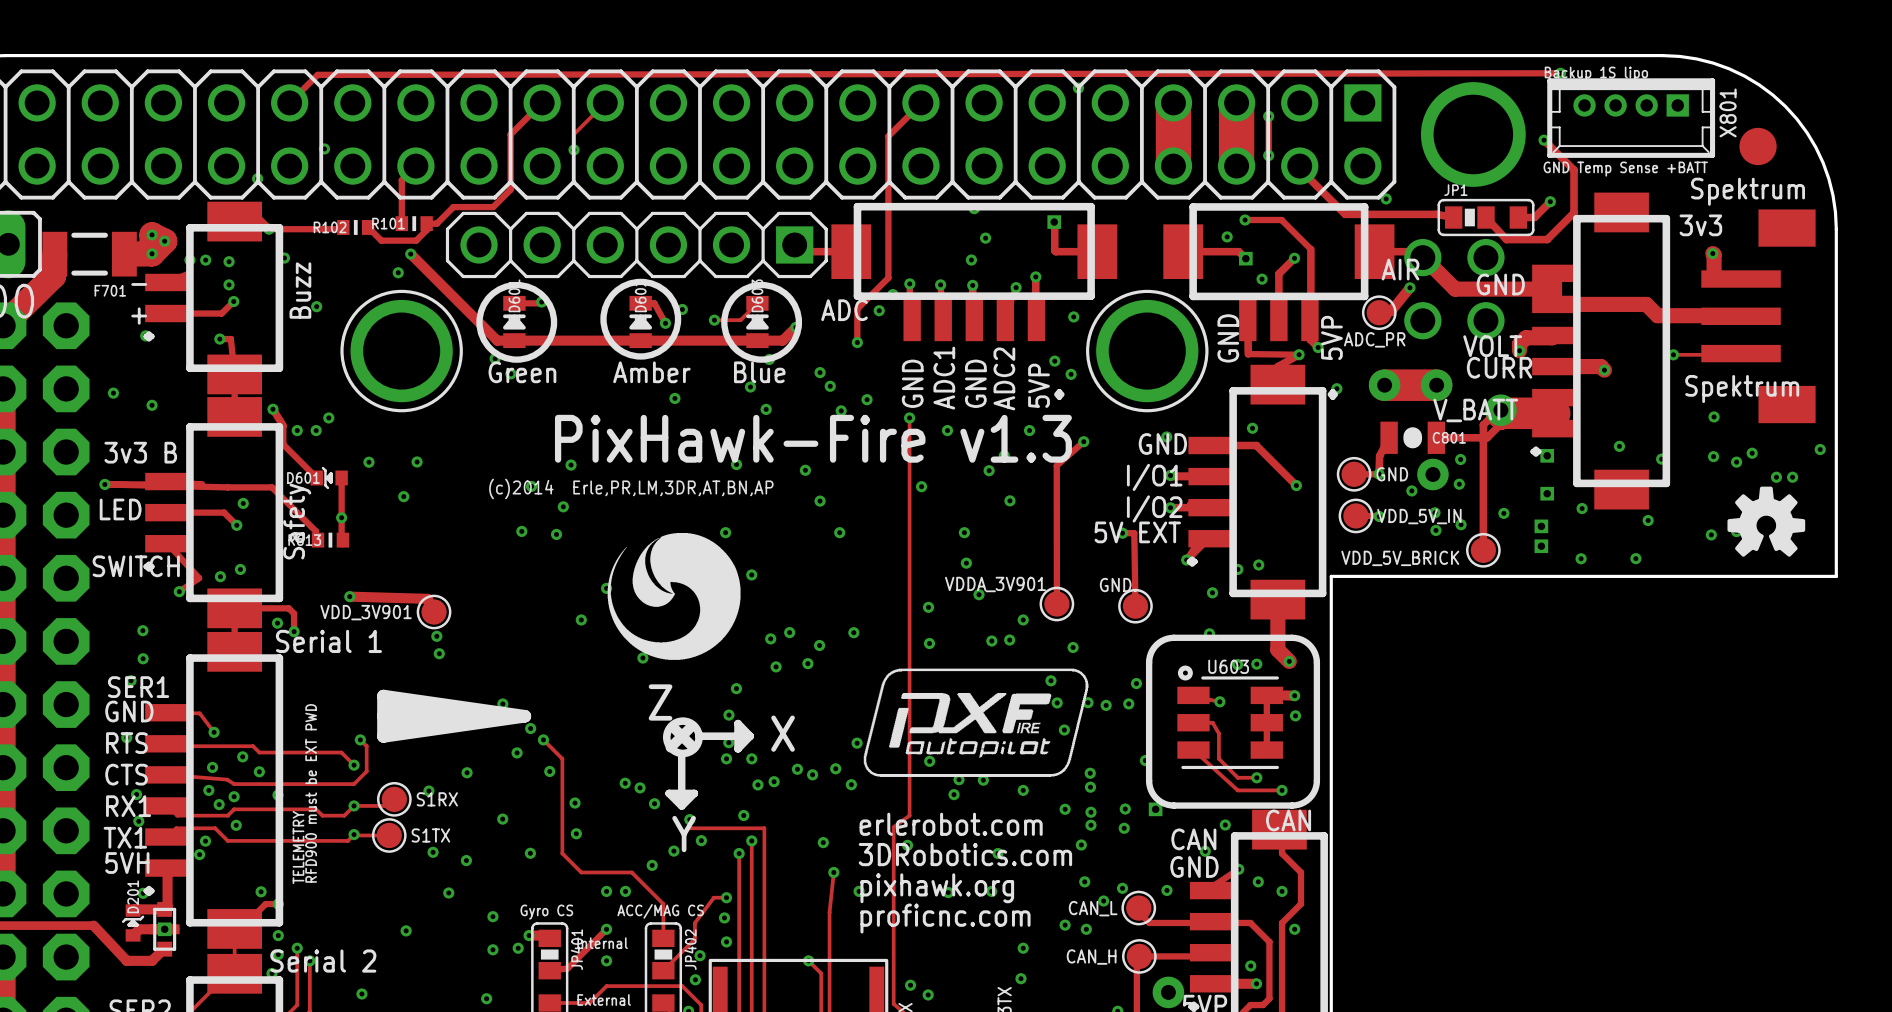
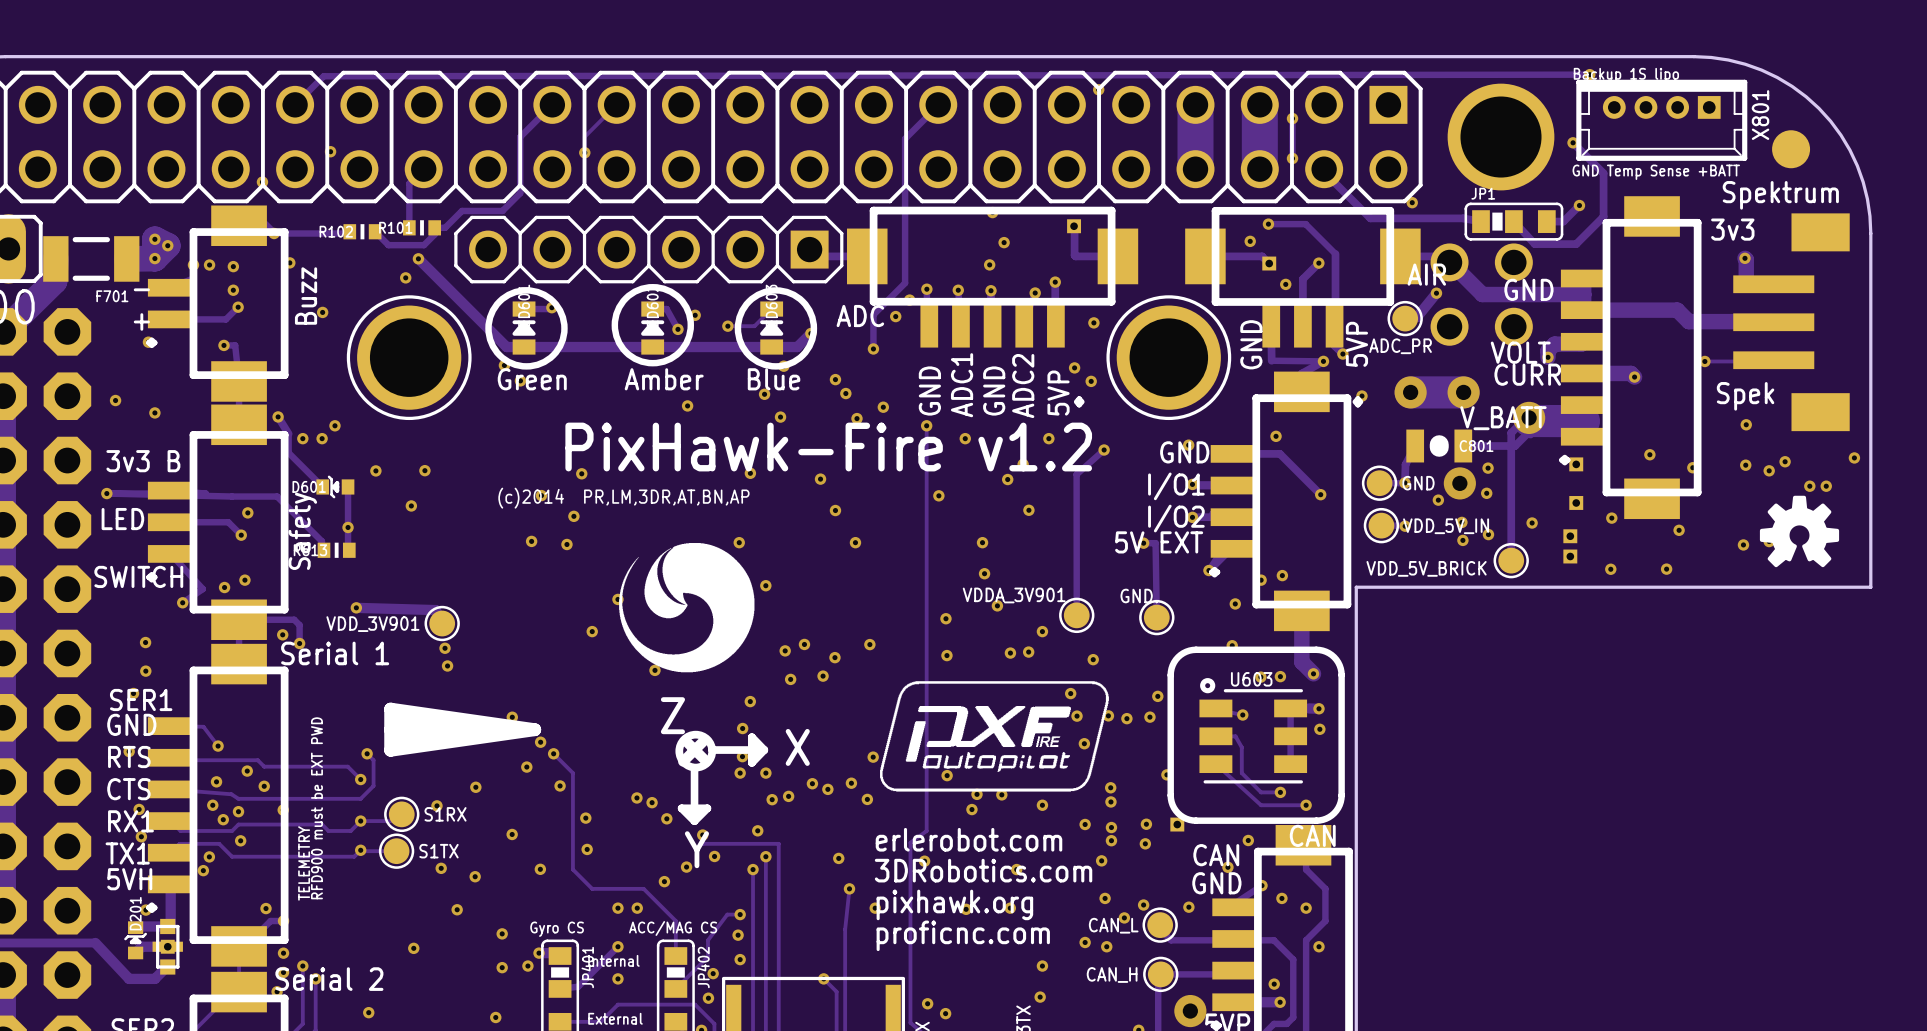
text: Spektrum (1742, 389) -> Spek (1745, 396)
text: PixHawk-Fire v1.3 (813, 438) -> PixHawk-Fire v1.2 (828, 447)
text: (c)2014 Erle,PR,LM,3DR,AT,BN,AP (631, 488) -> (c)2014 PR,LM,3DR,AT,BN,AP (623, 498)

